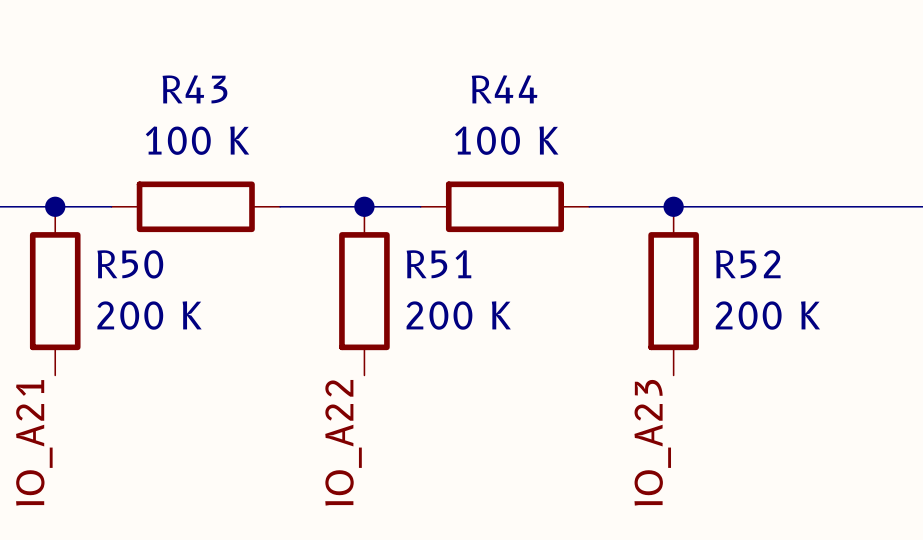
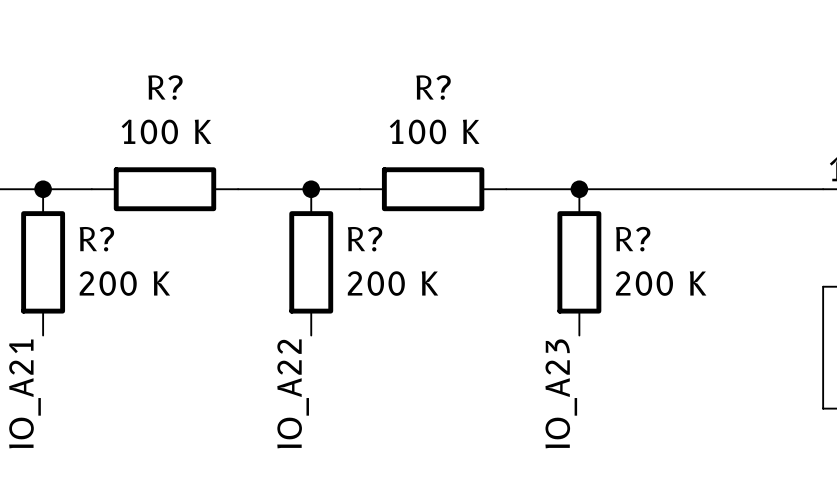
R43 name: R43 (194, 89) -> R? (165, 87)
R44 name: R44 (504, 89) -> R? (433, 87)
R50 name: R50 (130, 264) -> R? (96, 239)
R51 name: R51 (438, 264) -> R? (365, 239)
R52 name: R52 (748, 264) -> R? (633, 239)

